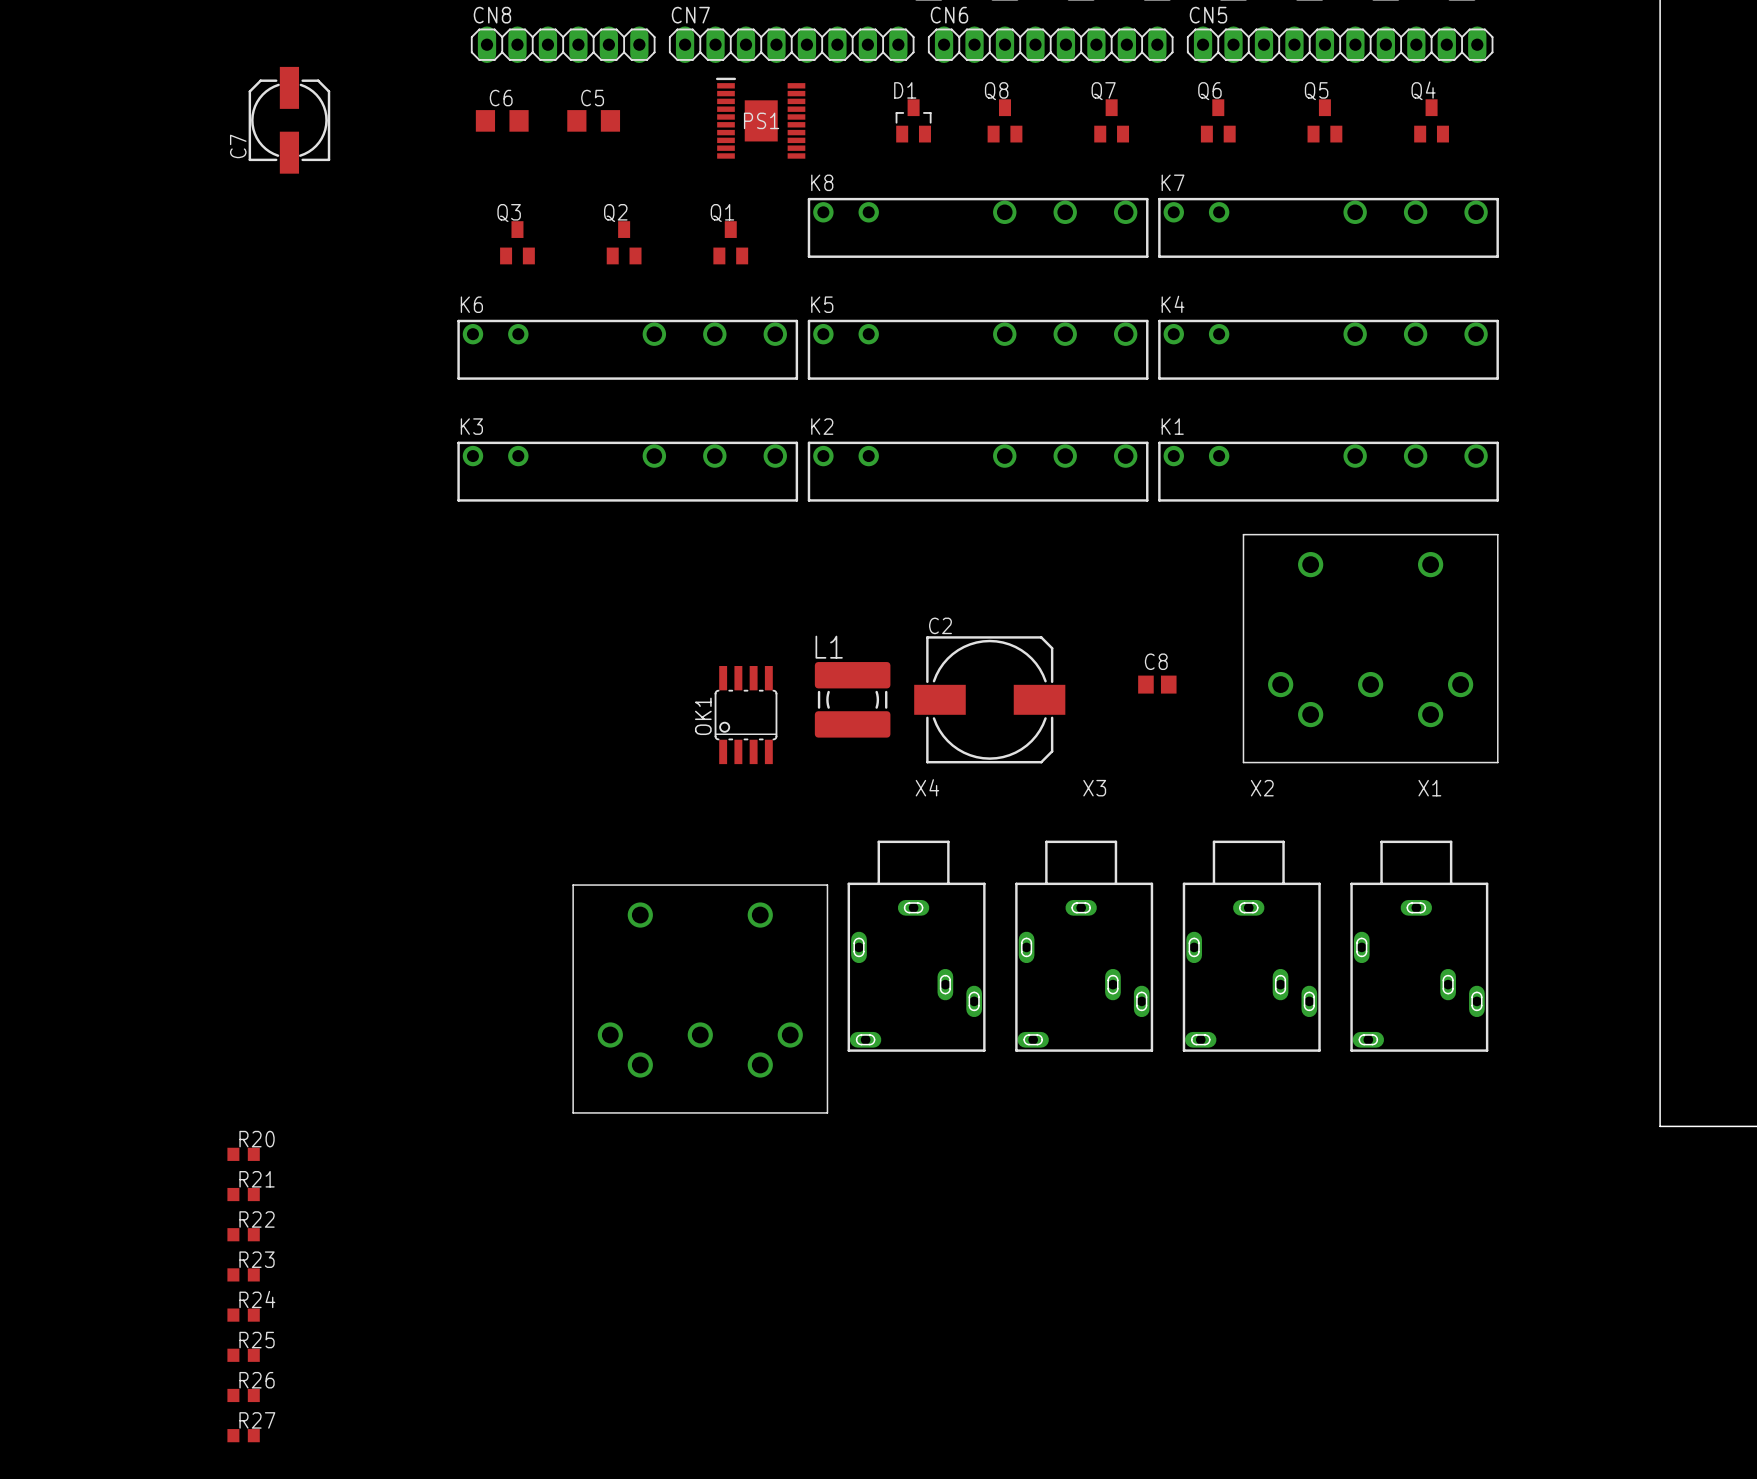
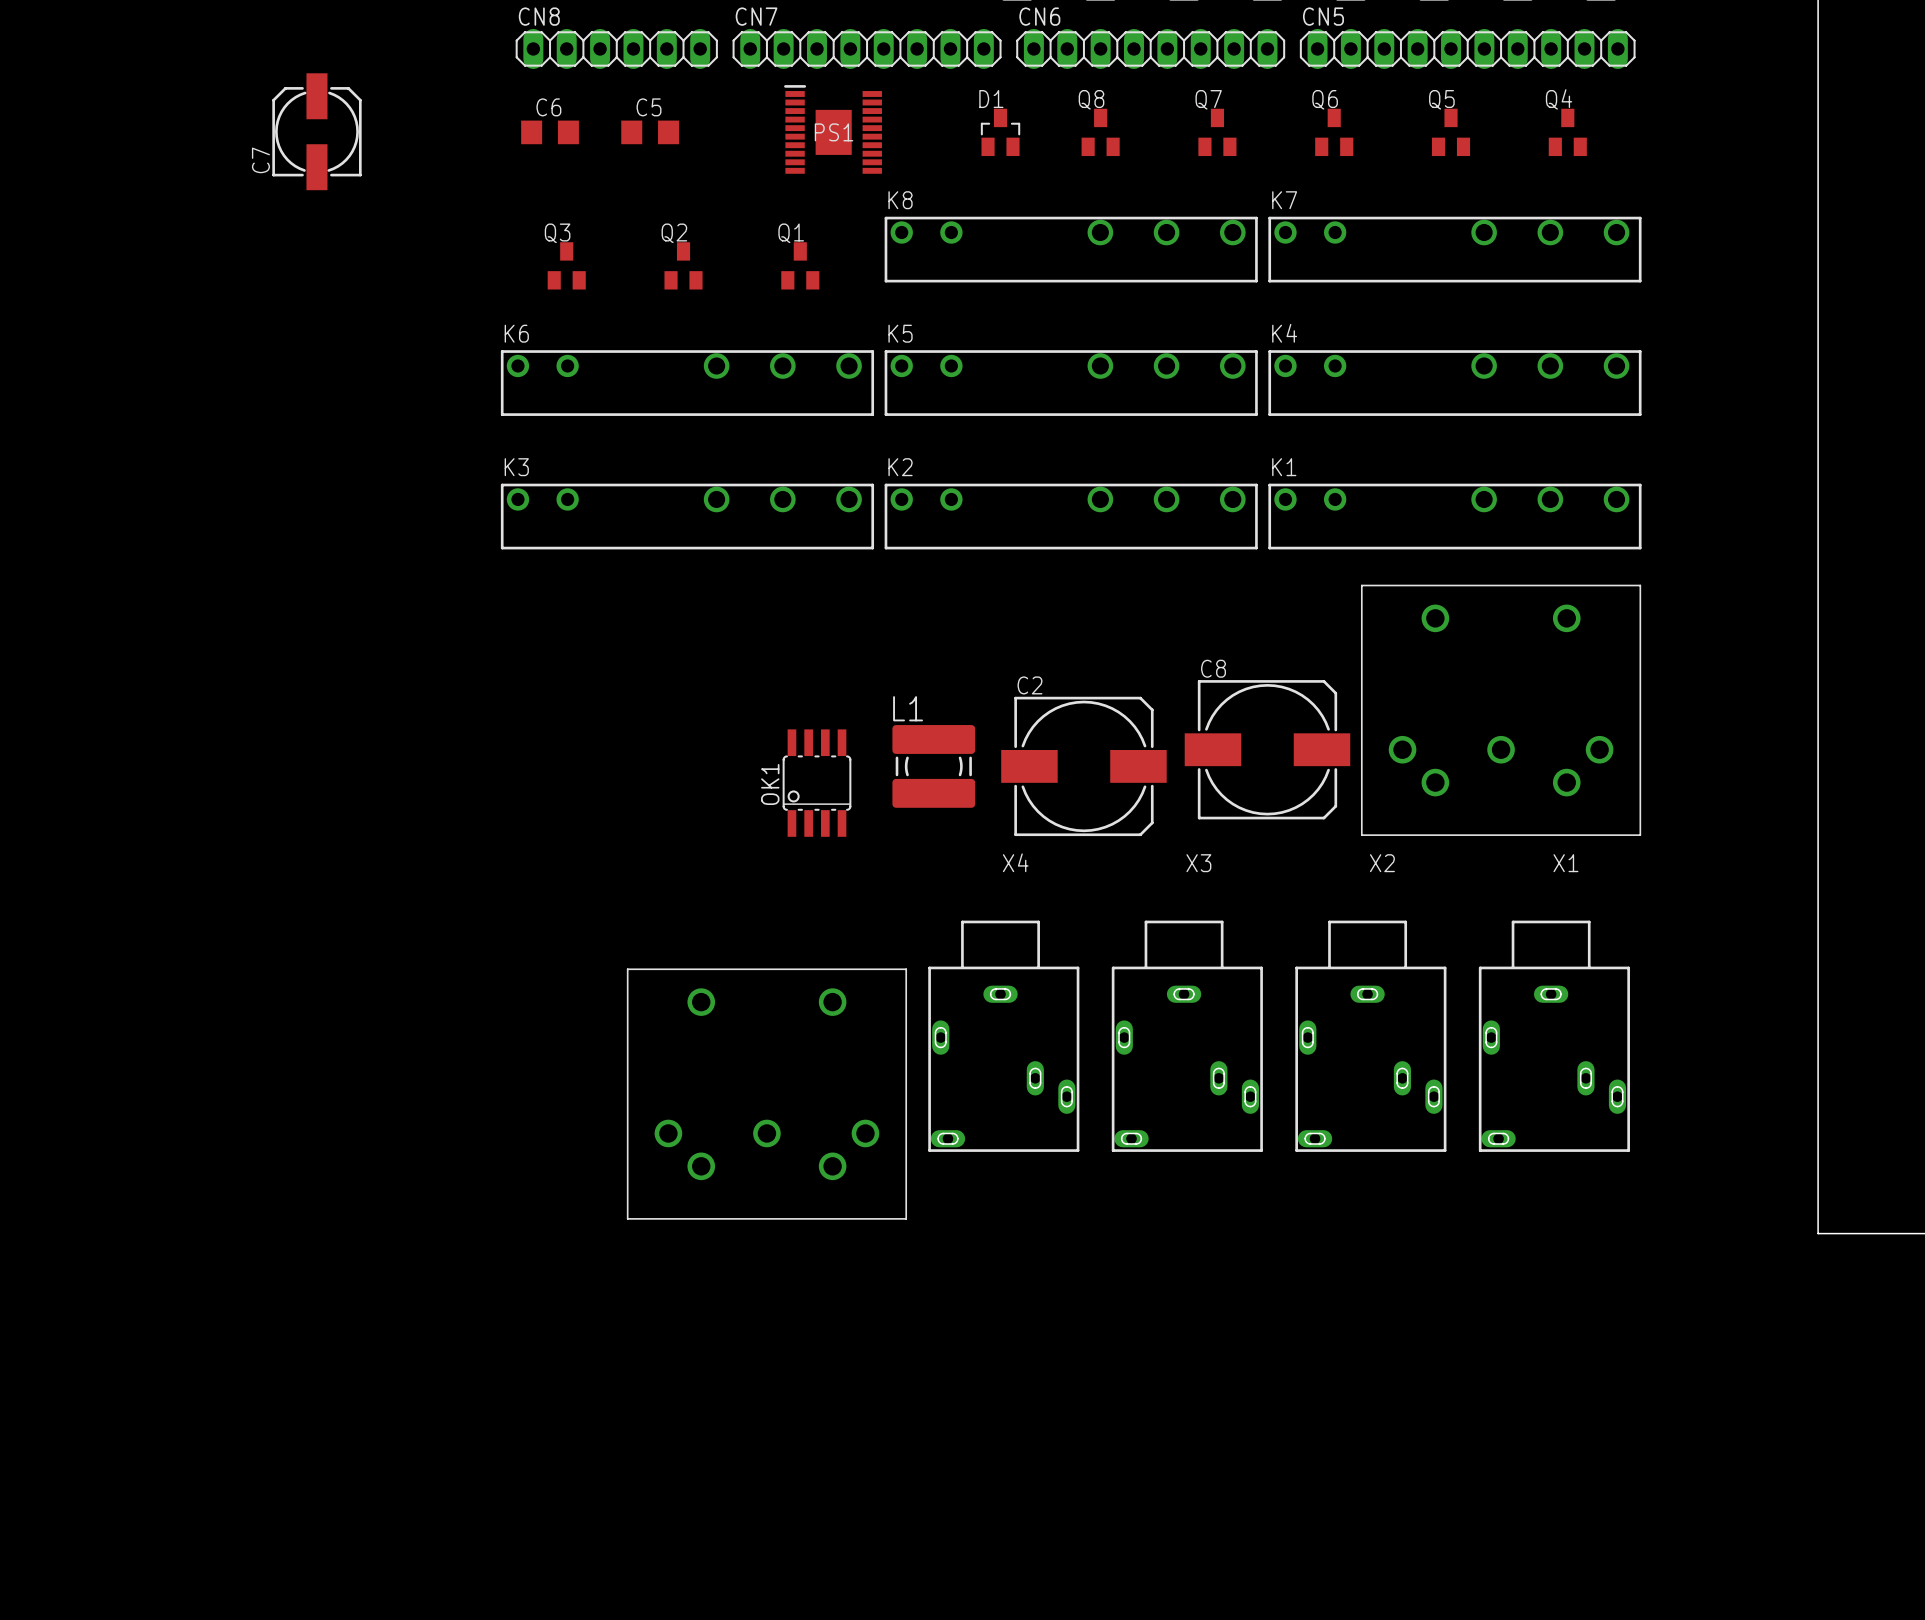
C8 name position: C8 (1156, 661) -> C8 (1213, 668)
C8 footprint: [1138, 675, 1177, 694] -> [1184, 680, 1351, 820]
R20: (243, 1154) -> none
R21: (243, 1194) -> none
R22: (243, 1234) -> none
R23: (243, 1274) -> none
R24: (243, 1315) -> none
R25: (243, 1355) -> none
R26: (243, 1395) -> none
R27: (243, 1435) -> none

